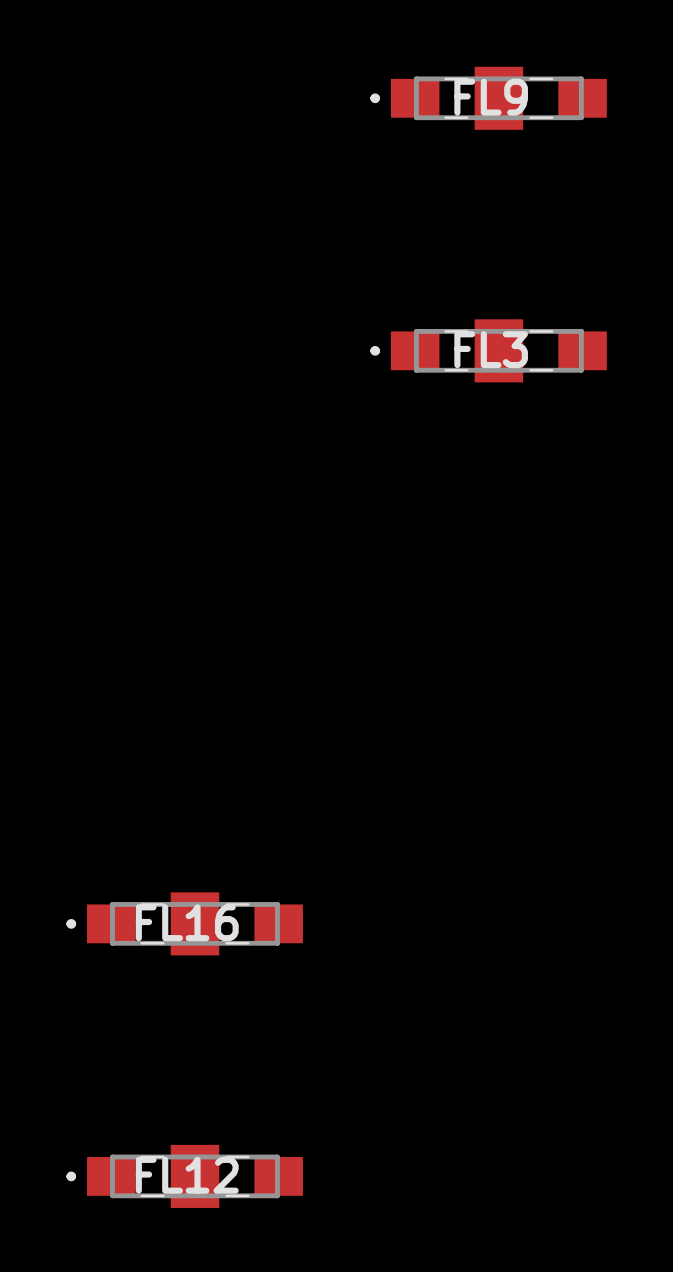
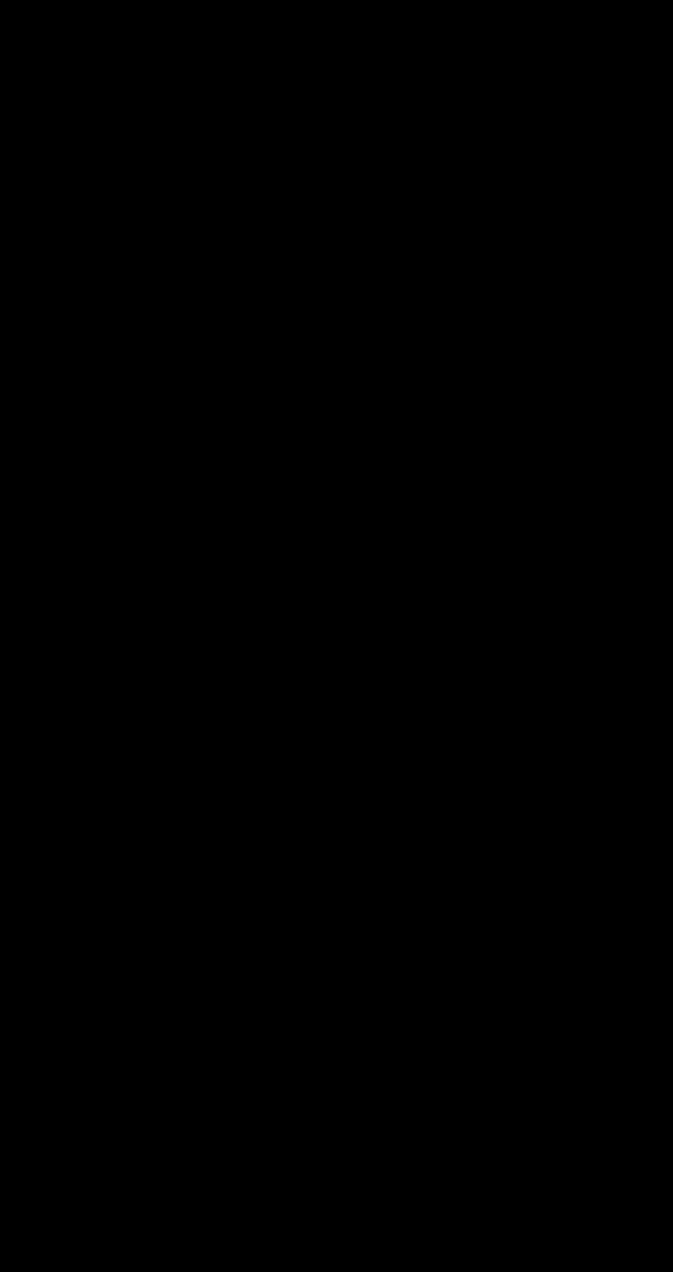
FL9: (488, 98) -> none
FL3: (488, 350) -> none
FL16: (184, 923) -> none
FL12: (184, 1176) -> none

